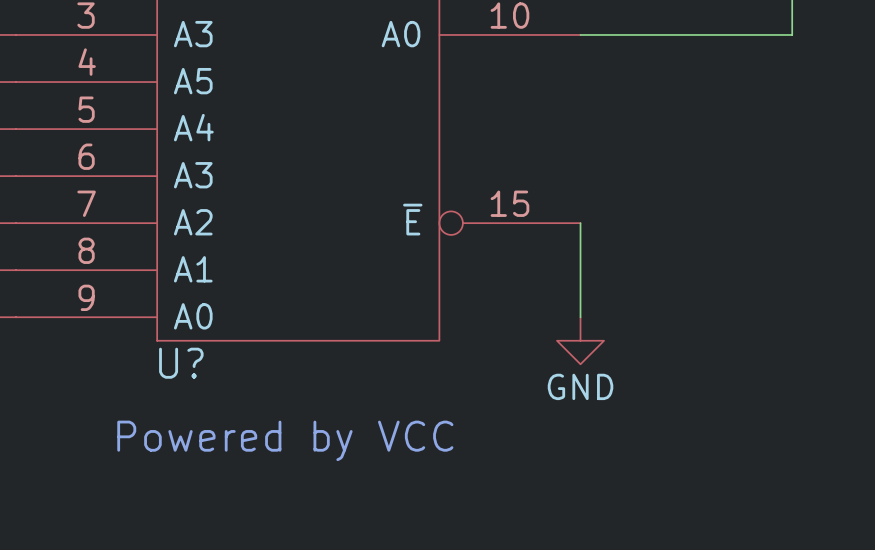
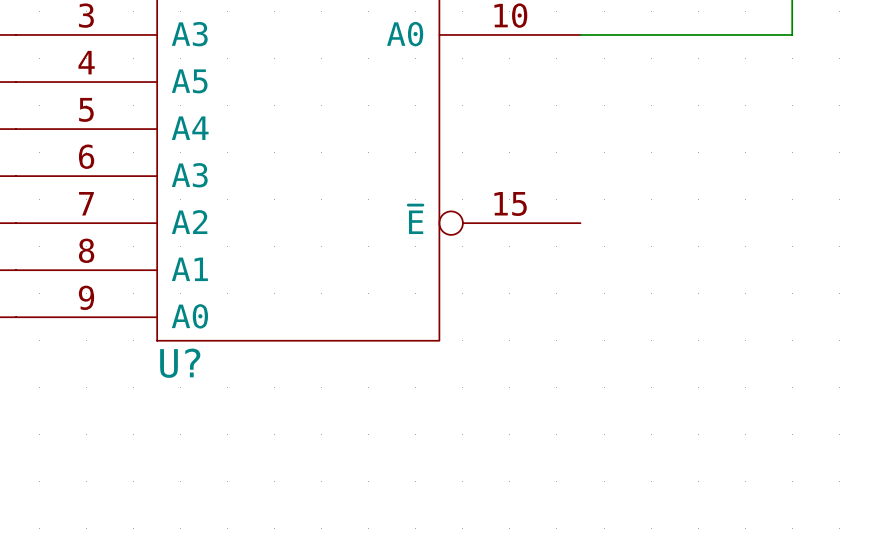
wire: (580, 223) (580, 317) -> none
power symbol: GND (580, 340) -> none
text: Powered by VCC (285, 440) -> none

